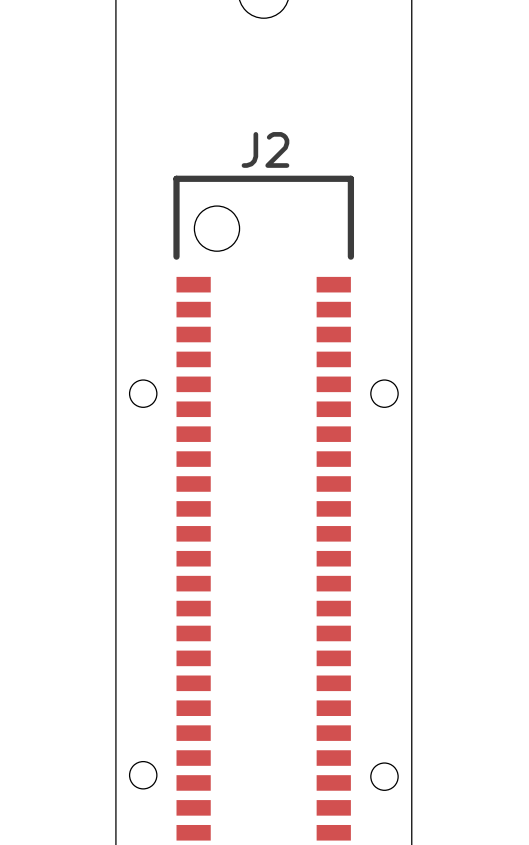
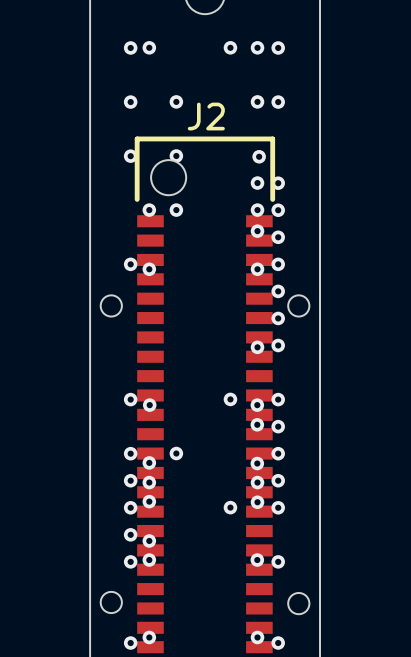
via: none -> (130, 47)
via: none -> (149, 47)
via: none -> (230, 47)
via: none -> (257, 47)
via: none -> (278, 47)
via: none -> (130, 102)
via: none -> (176, 101)
via: none -> (257, 101)
via: none -> (278, 102)
via: none -> (130, 156)
via: none -> (176, 155)
via: none -> (259, 156)
via: none -> (257, 183)
via: none -> (278, 183)
via: none -> (149, 210)
via: none -> (176, 210)
via: none -> (257, 210)
via: none -> (278, 210)
via: none -> (257, 231)
via: none -> (278, 237)
via: none -> (130, 264)
via: none -> (278, 264)
via: none -> (149, 269)
via: none -> (257, 269)
via: none -> (278, 291)
via: none -> (278, 318)
via: none -> (278, 345)
via: none -> (257, 347)
via: none -> (230, 399)
via: none -> (130, 399)
via: none -> (278, 399)
via: none -> (149, 405)
via: none -> (257, 405)
via: none -> (257, 424)
via: none -> (278, 426)
via: none -> (130, 453)
via: none -> (176, 453)
via: none -> (278, 453)
via: none -> (149, 462)
via: none -> (257, 463)
via: none -> (130, 480)
via: none -> (278, 480)
via: none -> (149, 482)
via: none -> (257, 482)
via: none -> (149, 501)
via: none -> (257, 502)
via: none -> (130, 507)
via: none -> (230, 507)
via: none -> (278, 507)
via: none -> (130, 534)
via: none -> (149, 540)
via: none -> (149, 560)
via: none -> (257, 560)
via: none -> (130, 561)
via: none -> (278, 561)
via: none -> (149, 637)
via: none -> (257, 637)
via: none -> (130, 643)
via: none -> (278, 643)

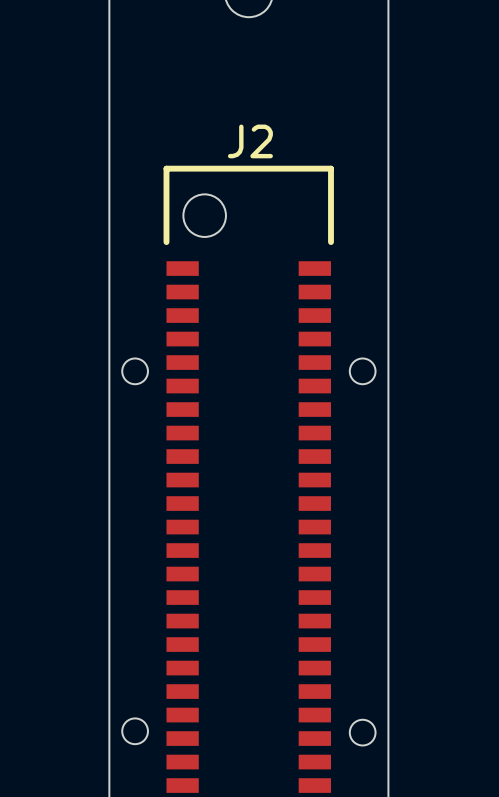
via: (130, 47) -> none
via: (149, 47) -> none
via: (230, 47) -> none
via: (257, 47) -> none
via: (278, 47) -> none
via: (176, 101) -> none
via: (257, 101) -> none
via: (130, 102) -> none
via: (278, 102) -> none
via: (176, 155) -> none
via: (130, 156) -> none
via: (259, 156) -> none
via: (257, 183) -> none
via: (278, 183) -> none
via: (149, 210) -> none
via: (176, 210) -> none
via: (257, 210) -> none
via: (278, 210) -> none
via: (257, 231) -> none
via: (278, 237) -> none
via: (130, 264) -> none
via: (278, 264) -> none
via: (149, 269) -> none
via: (257, 269) -> none
via: (278, 291) -> none
via: (278, 318) -> none
via: (278, 345) -> none
via: (257, 347) -> none
via: (130, 399) -> none
via: (230, 399) -> none
via: (278, 399) -> none
via: (149, 405) -> none
via: (257, 405) -> none
via: (257, 424) -> none
via: (278, 426) -> none
via: (130, 453) -> none
via: (176, 453) -> none
via: (278, 453) -> none
via: (149, 462) -> none
via: (257, 463) -> none
via: (130, 480) -> none
via: (278, 480) -> none
via: (149, 482) -> none
via: (257, 482) -> none
via: (149, 501) -> none
via: (257, 502) -> none
via: (130, 507) -> none
via: (230, 507) -> none
via: (278, 507) -> none
via: (130, 534) -> none
via: (149, 540) -> none
via: (149, 560) -> none
via: (257, 560) -> none
via: (130, 561) -> none
via: (278, 561) -> none
via: (149, 637) -> none
via: (257, 637) -> none
via: (130, 643) -> none
via: (278, 643) -> none

